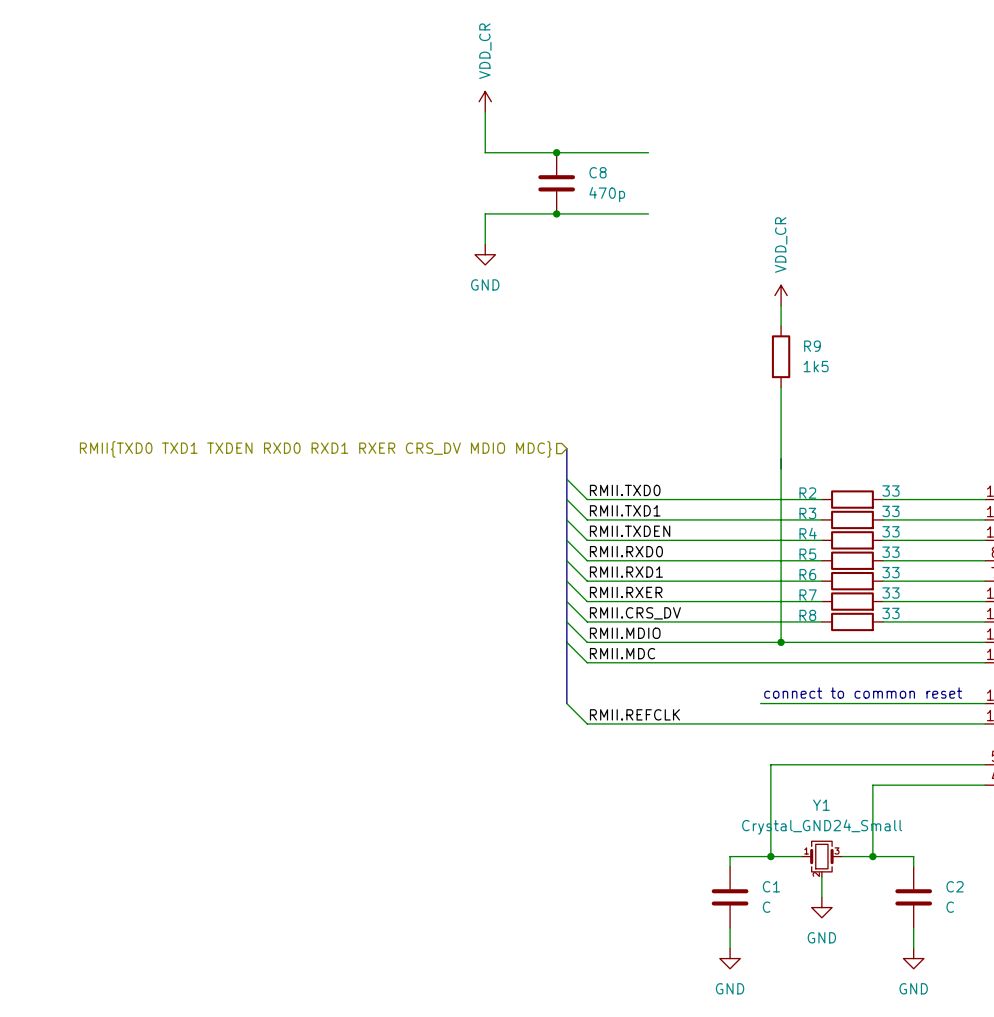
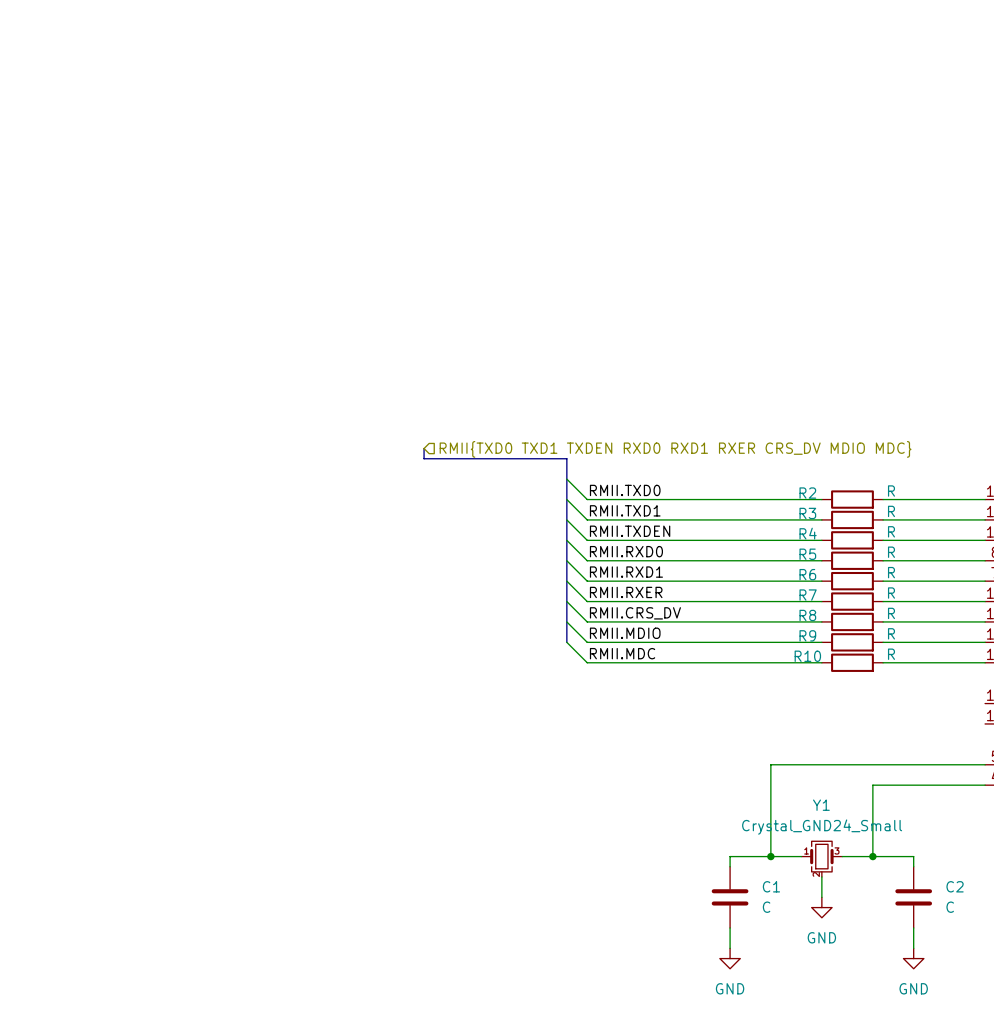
power symbol: VDD_CR (485, 101) -> none
wire: (485, 111) (485, 152) (648, 152) -> none
junction: (556, 152) -> none
C8: 470p (556, 183) -> none
junction: (556, 213) -> none
wire: (648, 213) (485, 213) (485, 244) -> none
power symbol: GND (485, 254) -> none
power symbol: VDD_CR (781, 295) -> none
wire: (781, 305) (781, 326) -> none
R9 name position: R9 (812, 346) -> R9 (807, 635)
R9 rotation: 0° (781, 356) -> 90° clockwise (852, 642)
R9 position: (781, 356) -> (852, 642)
R9 value: 1k5 (816, 366) -> R (891, 633)
wire: (781, 387) (781, 642) -> none
bus: (566, 448) (566, 458) -> (424, 448) (424, 458) (566, 458)
hierarchical label rotation: 0° (315, 449) -> 180° (675, 449)
bus: (781, 458) (781, 468) -> none
R2 value: 33 (890, 491) -> R (891, 491)
R3 value: 33 (890, 511) -> R (891, 511)
R4 value: 33 (890, 531) -> R (891, 531)
R5 value: 33 (890, 552) -> R (891, 552)
R6 value: 33 (890, 572) -> R (891, 572)
R7 value: 33 (890, 593) -> R (891, 593)
R8 value: 33 (890, 613) -> R (891, 613)
bus: (566, 642) (566, 703) -> none
junction: (781, 642) -> none
wire: (821, 642) (883, 642) -> none
wire: (821, 662) (883, 662) -> none
R10: none -> R (852, 662)
text: connect to common reset (863, 693) -> none
wire: (566, 703) (587, 723) (985, 723) -> none
wire: (760, 703) (985, 703) -> none
label: RMII.REFCLK (634, 714) -> none

